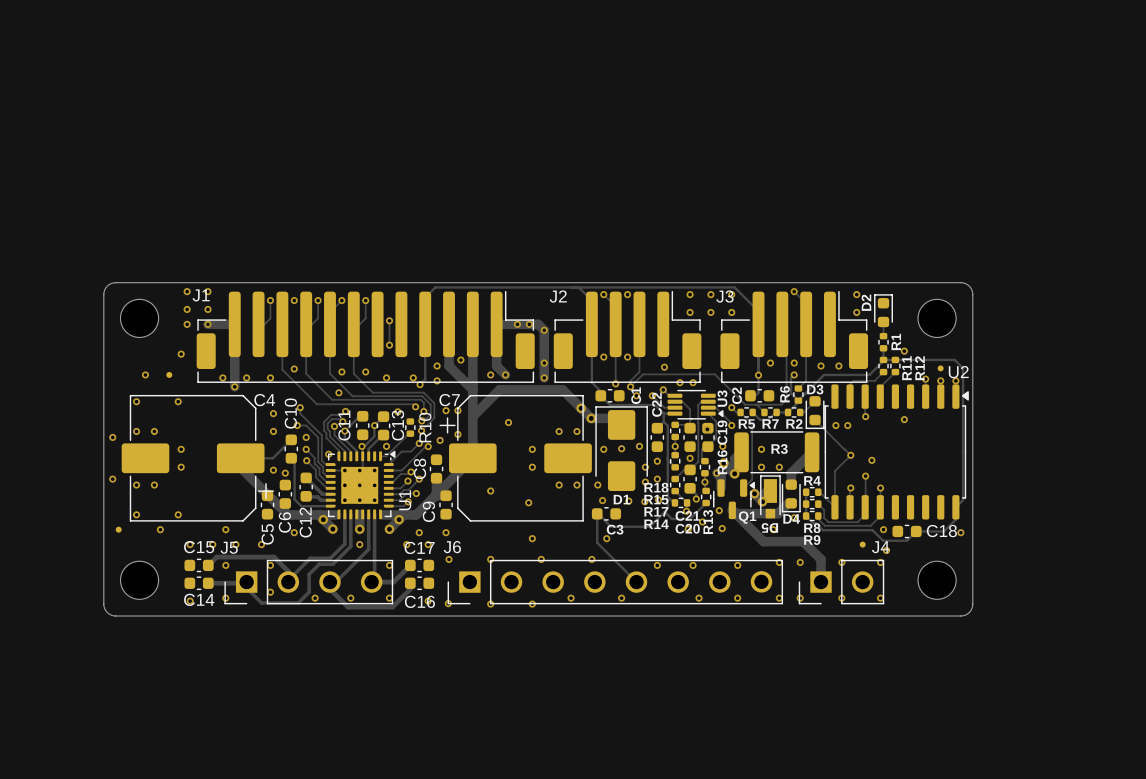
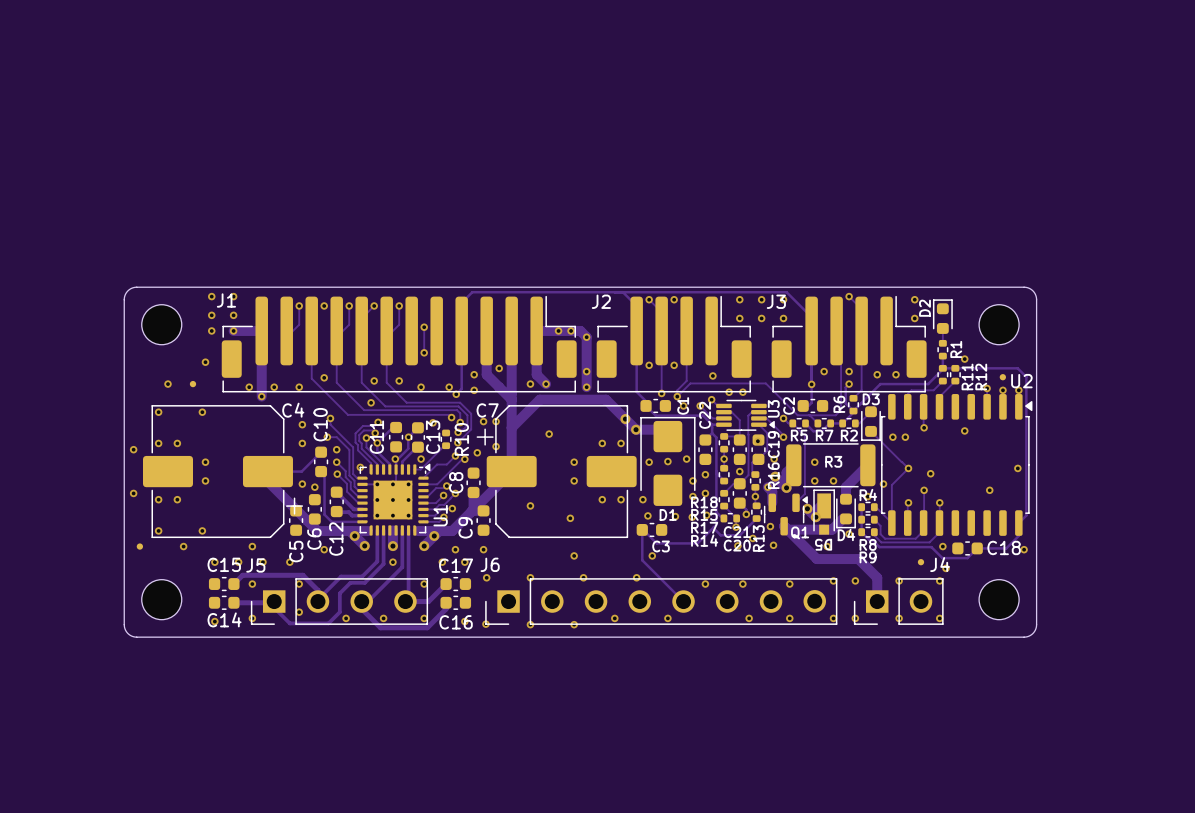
via: none -> (1017, 468)
via: none -> (883, 484)
via: none -> (989, 490)
via: none -> (867, 496)

